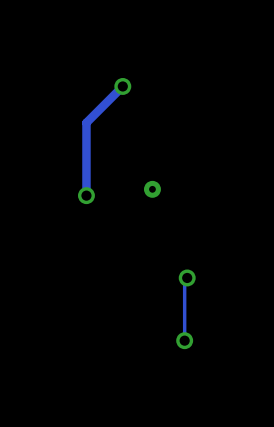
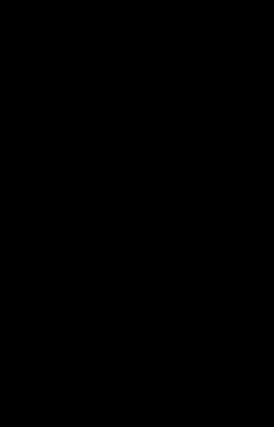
track: (122, 86) (86, 122) (86, 195) -> none
via: (122, 86) -> none
part: (152, 189) -> none
via: (86, 195) -> none
track: (187, 277) (184, 280) (184, 340) -> none
via: (187, 277) -> none
via: (184, 340) -> none

